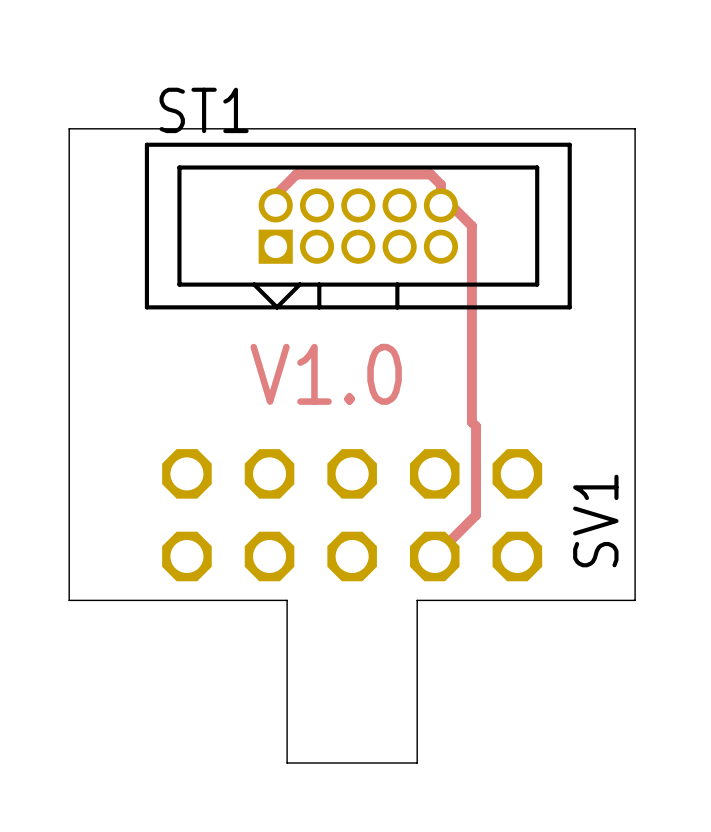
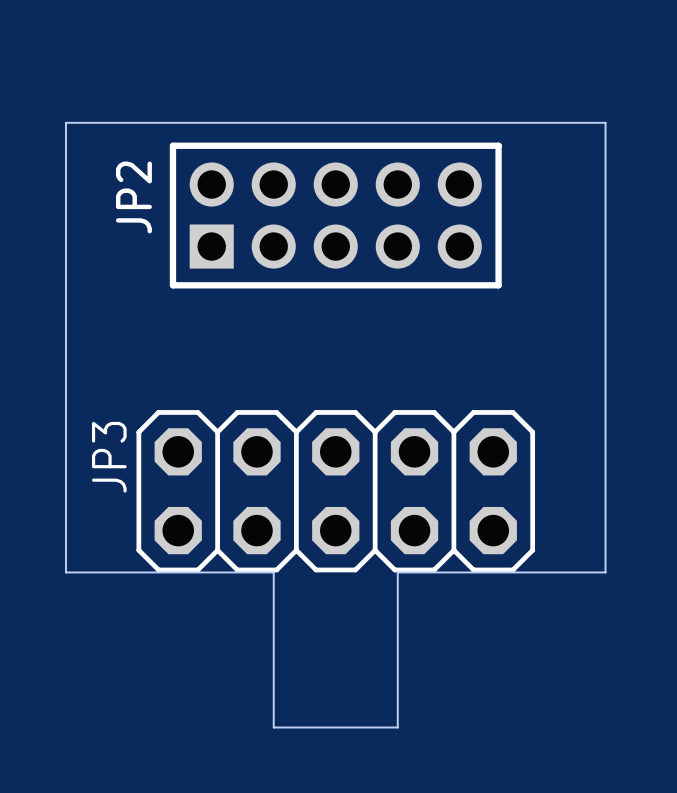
track: (275, 205) (275, 195) (296, 174) (430, 174) (440, 184) (440, 205) (451, 205) (471, 226) (471, 422) (476, 426) (476, 515) (434, 556) -> none
JP2: none -> (335, 215)
ST1: (358, 226) -> none
text: V1.0 (326, 374) -> none
SV1: (352, 515) -> none
JP3: none -> (335, 491)

